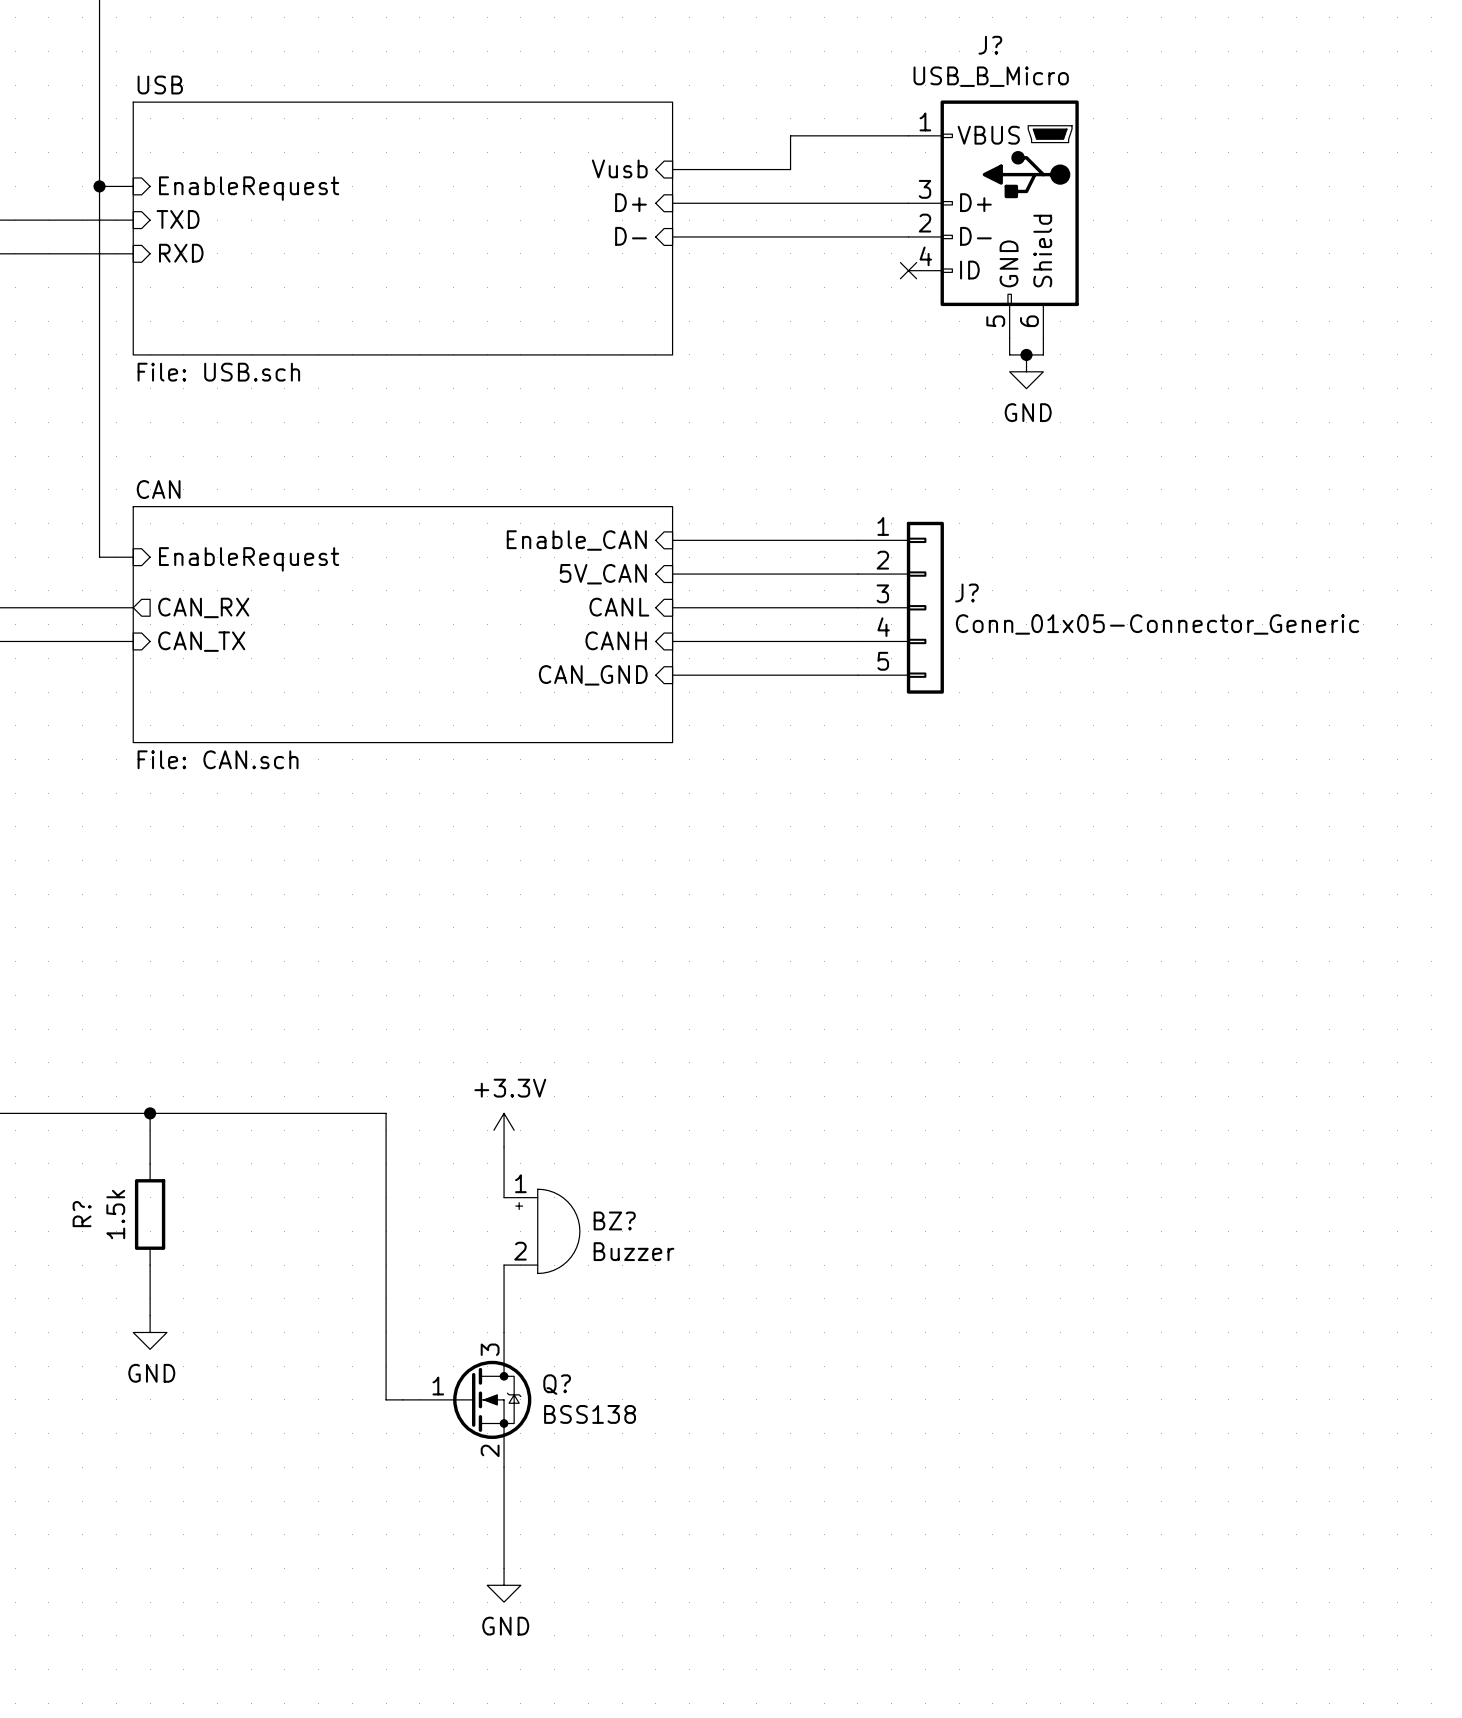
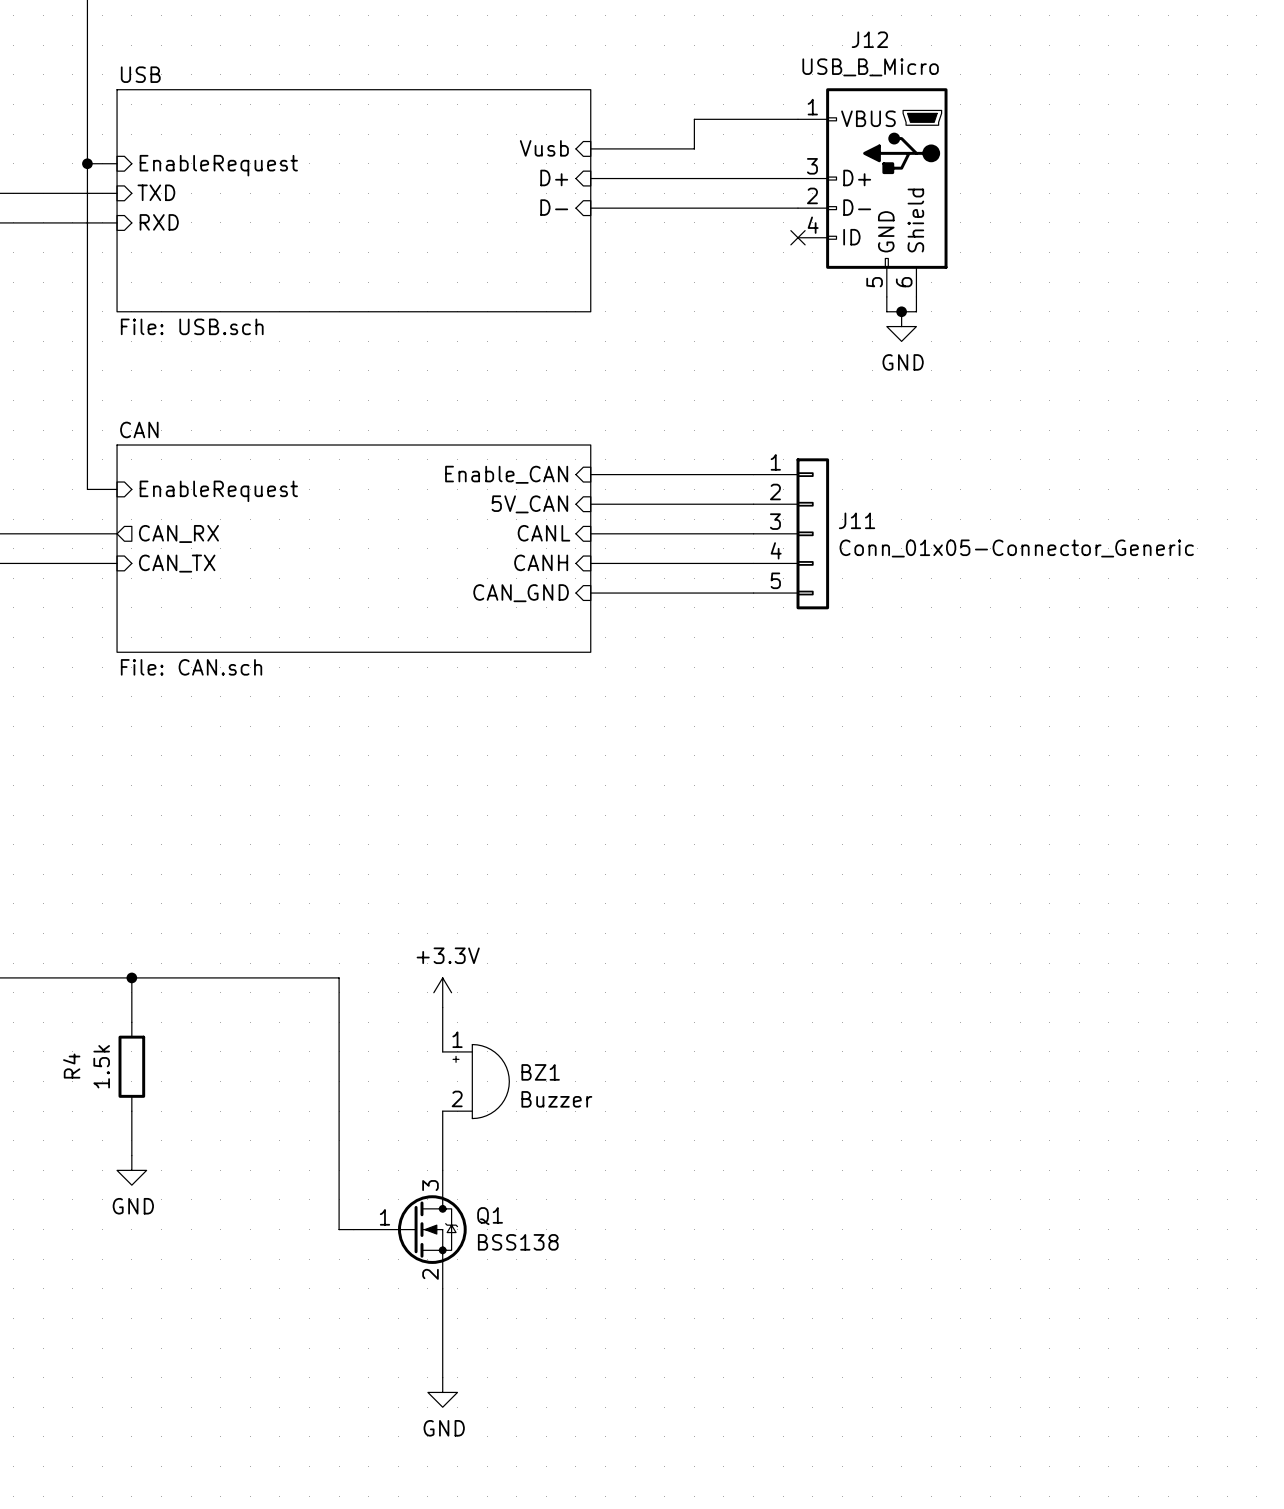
J? name: J? (990, 45) -> J12 (869, 39)
J? name: J? (966, 592) -> J11 (857, 520)
R? name: R? (82, 1214) -> R4 (71, 1066)
BZ? name: BZ? (614, 1220) -> BZ1 (540, 1072)
Q? name: Q? (557, 1384) -> Q1 (490, 1216)

